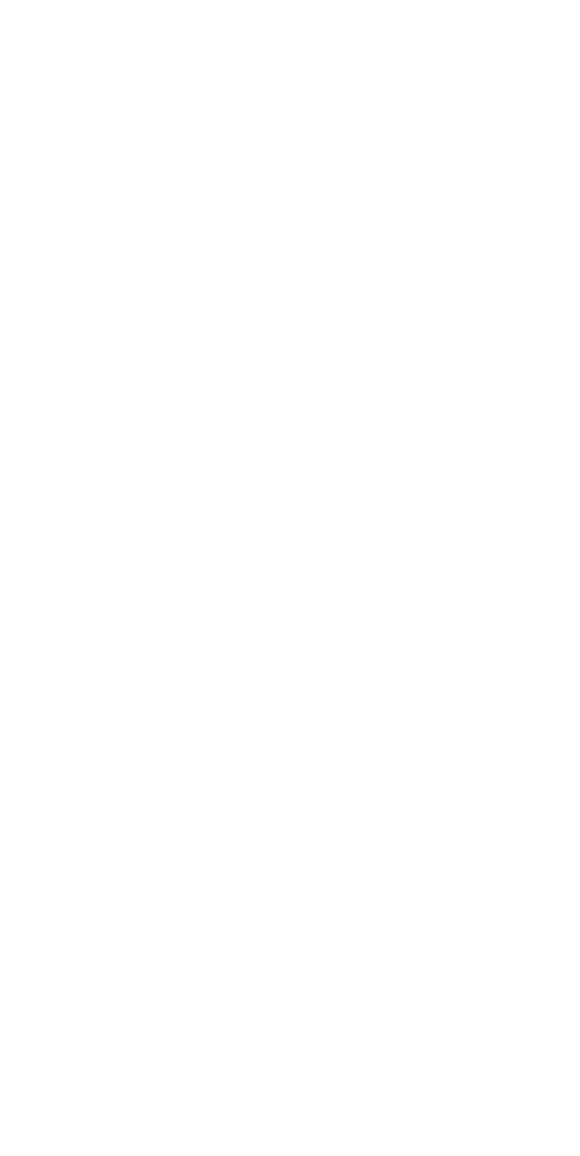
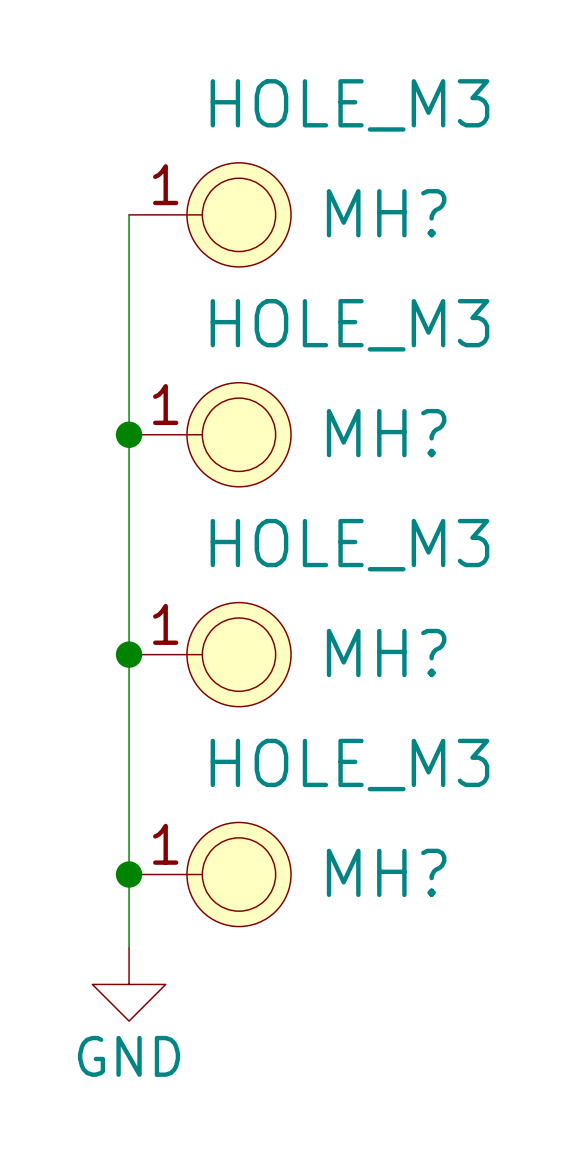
wire: none -> (129, 214) (129, 947)
MH?: none -> HOLE_M3 (210, 214)
junction: none -> (129, 434)
MH?: none -> HOLE_M3 (210, 434)
junction: none -> (129, 654)
MH?: none -> HOLE_M3 (210, 654)
junction: none -> (129, 874)
MH?: none -> HOLE_M3 (210, 874)
power symbol: none -> GND (129, 984)

